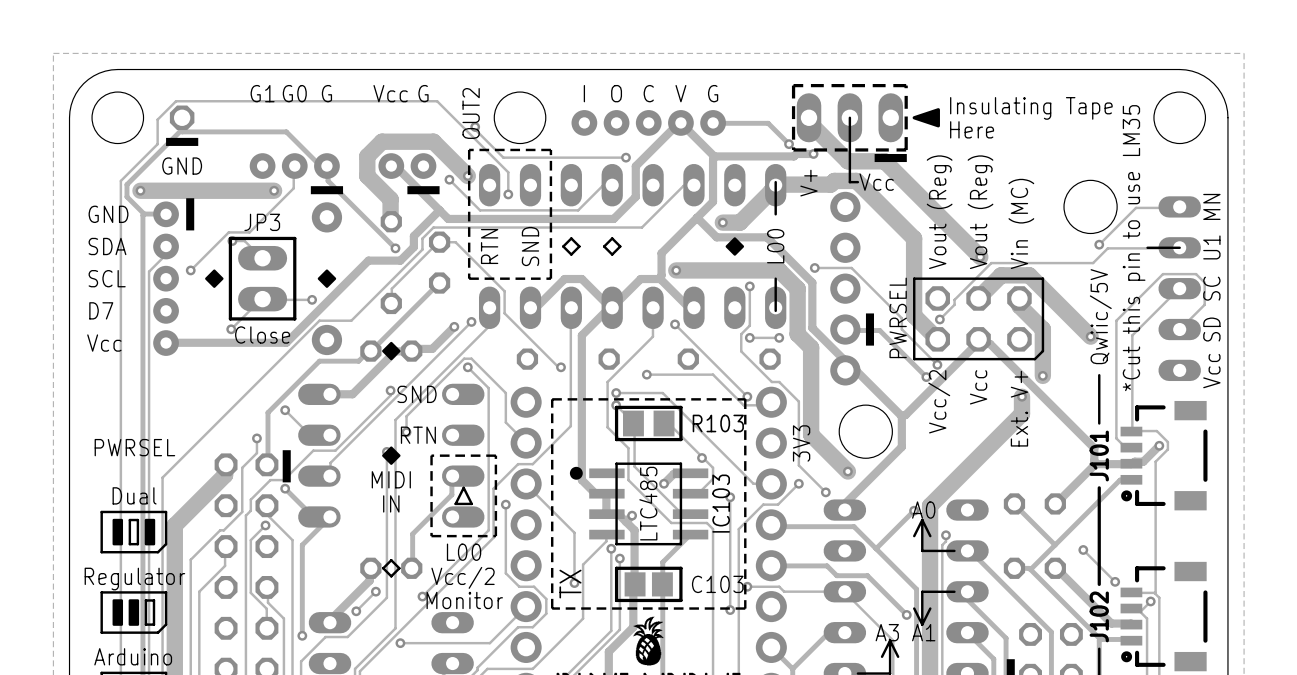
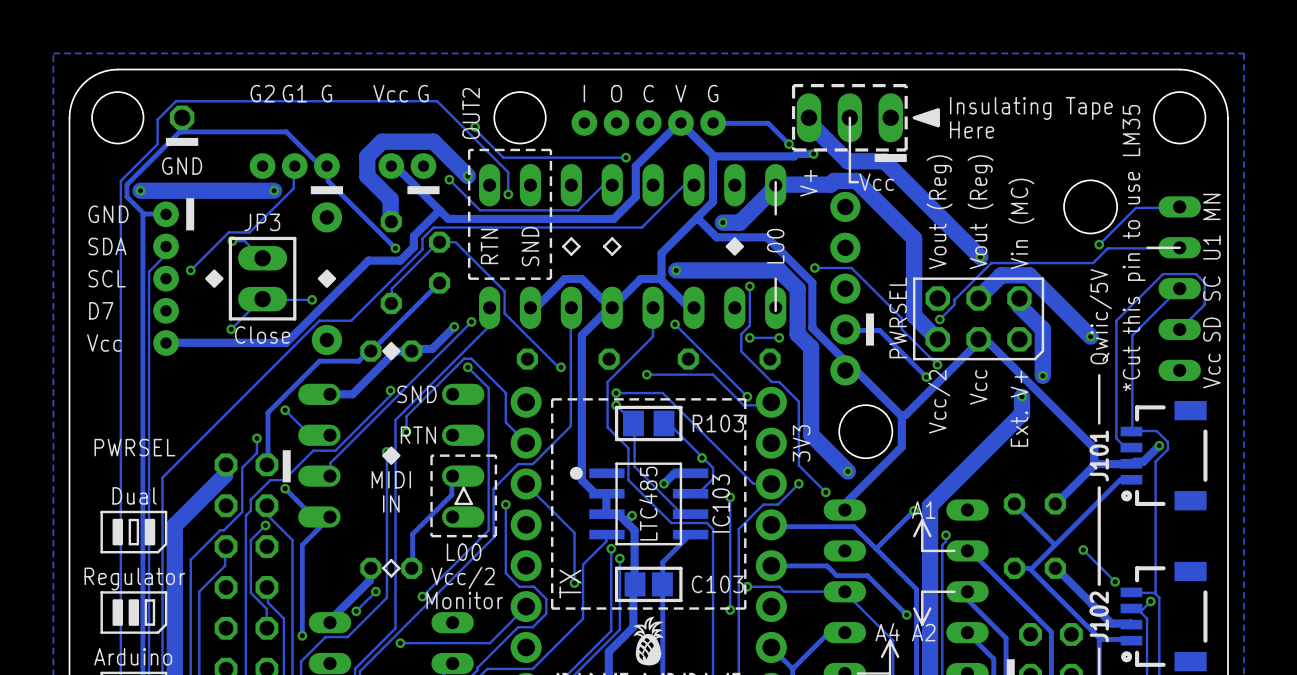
text: G1 (262, 93) -> G2 (262, 93)
text: G0 (294, 93) -> G1 (294, 93)
text: A0 (923, 510) -> A1 (923, 510)
text: A3 (887, 632) -> A4 (887, 632)
text: A1 (923, 632) -> A2 (923, 632)

